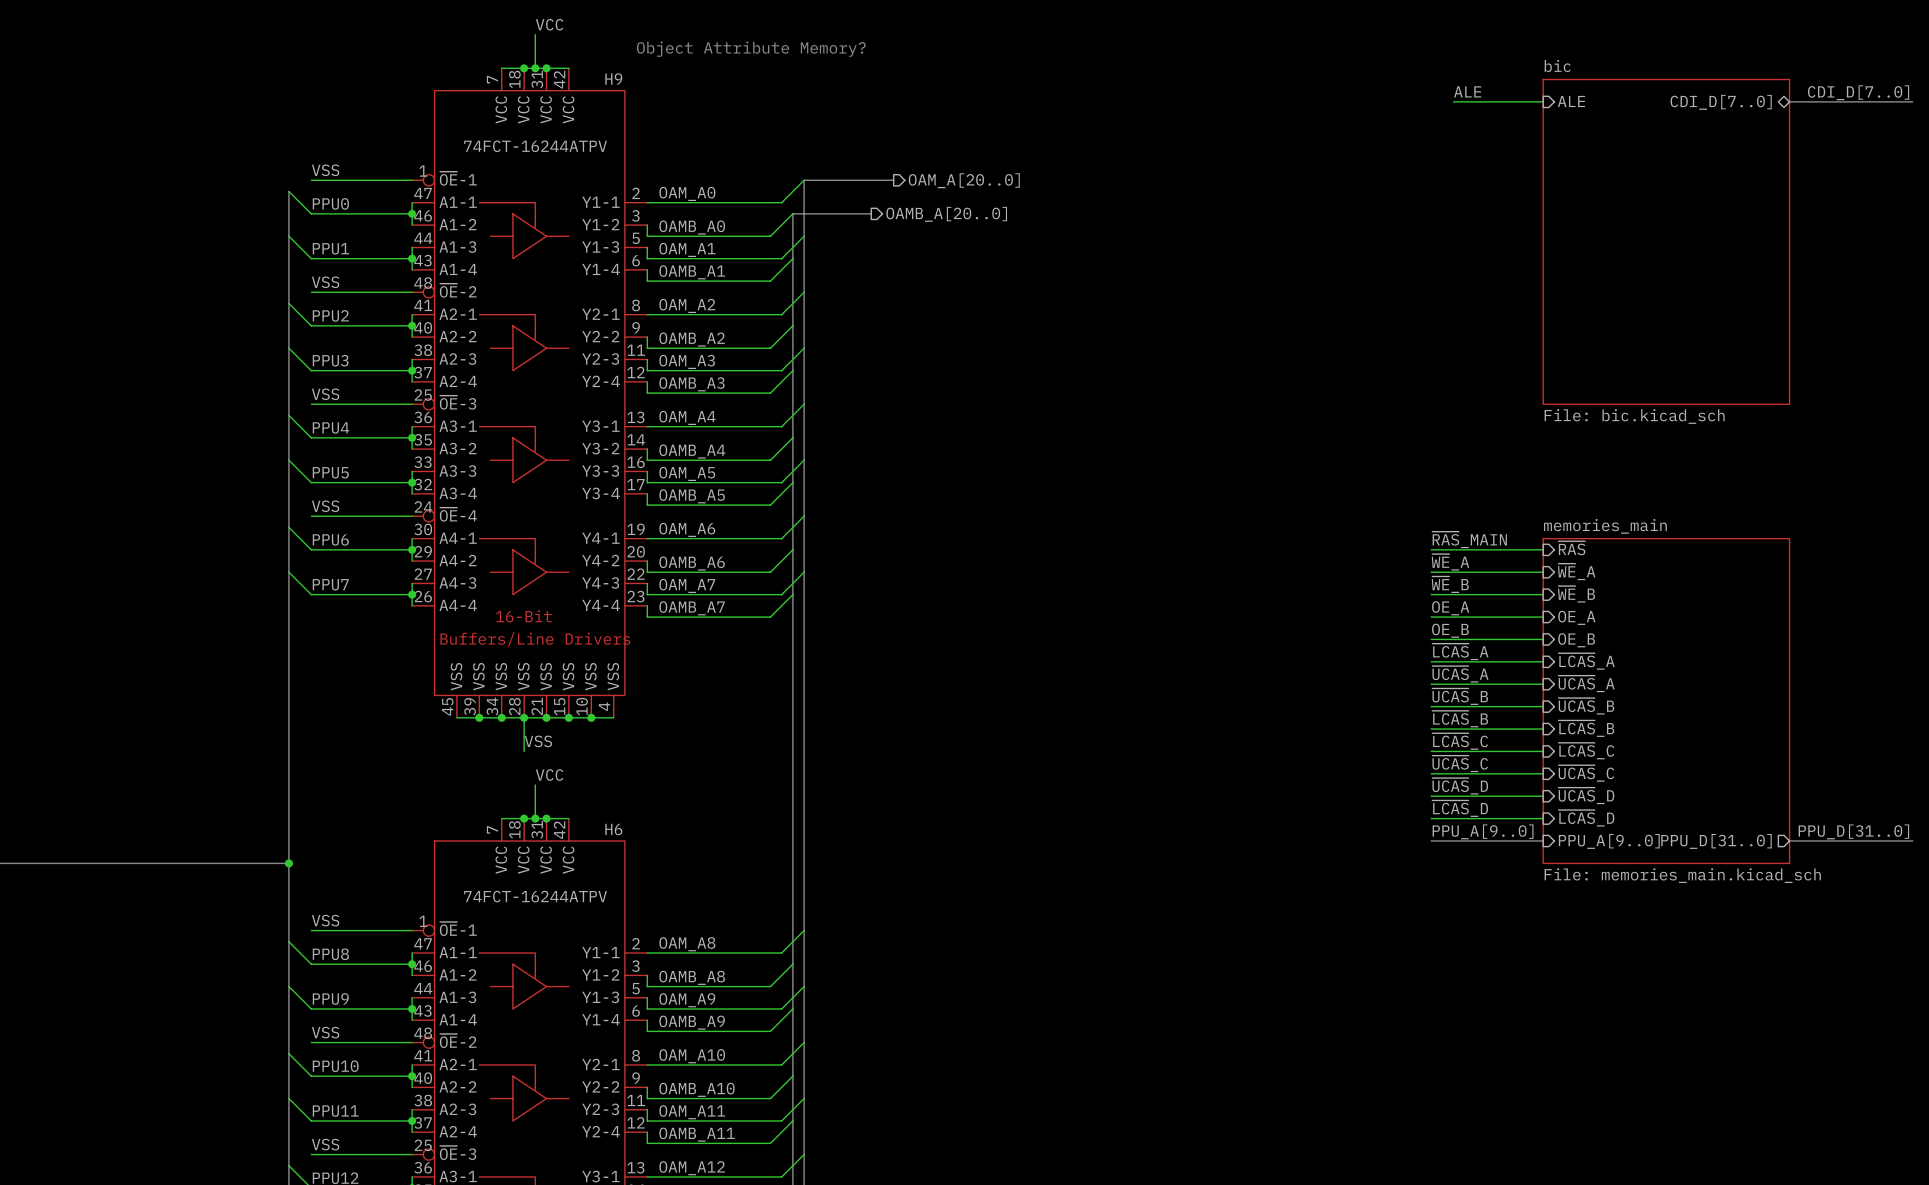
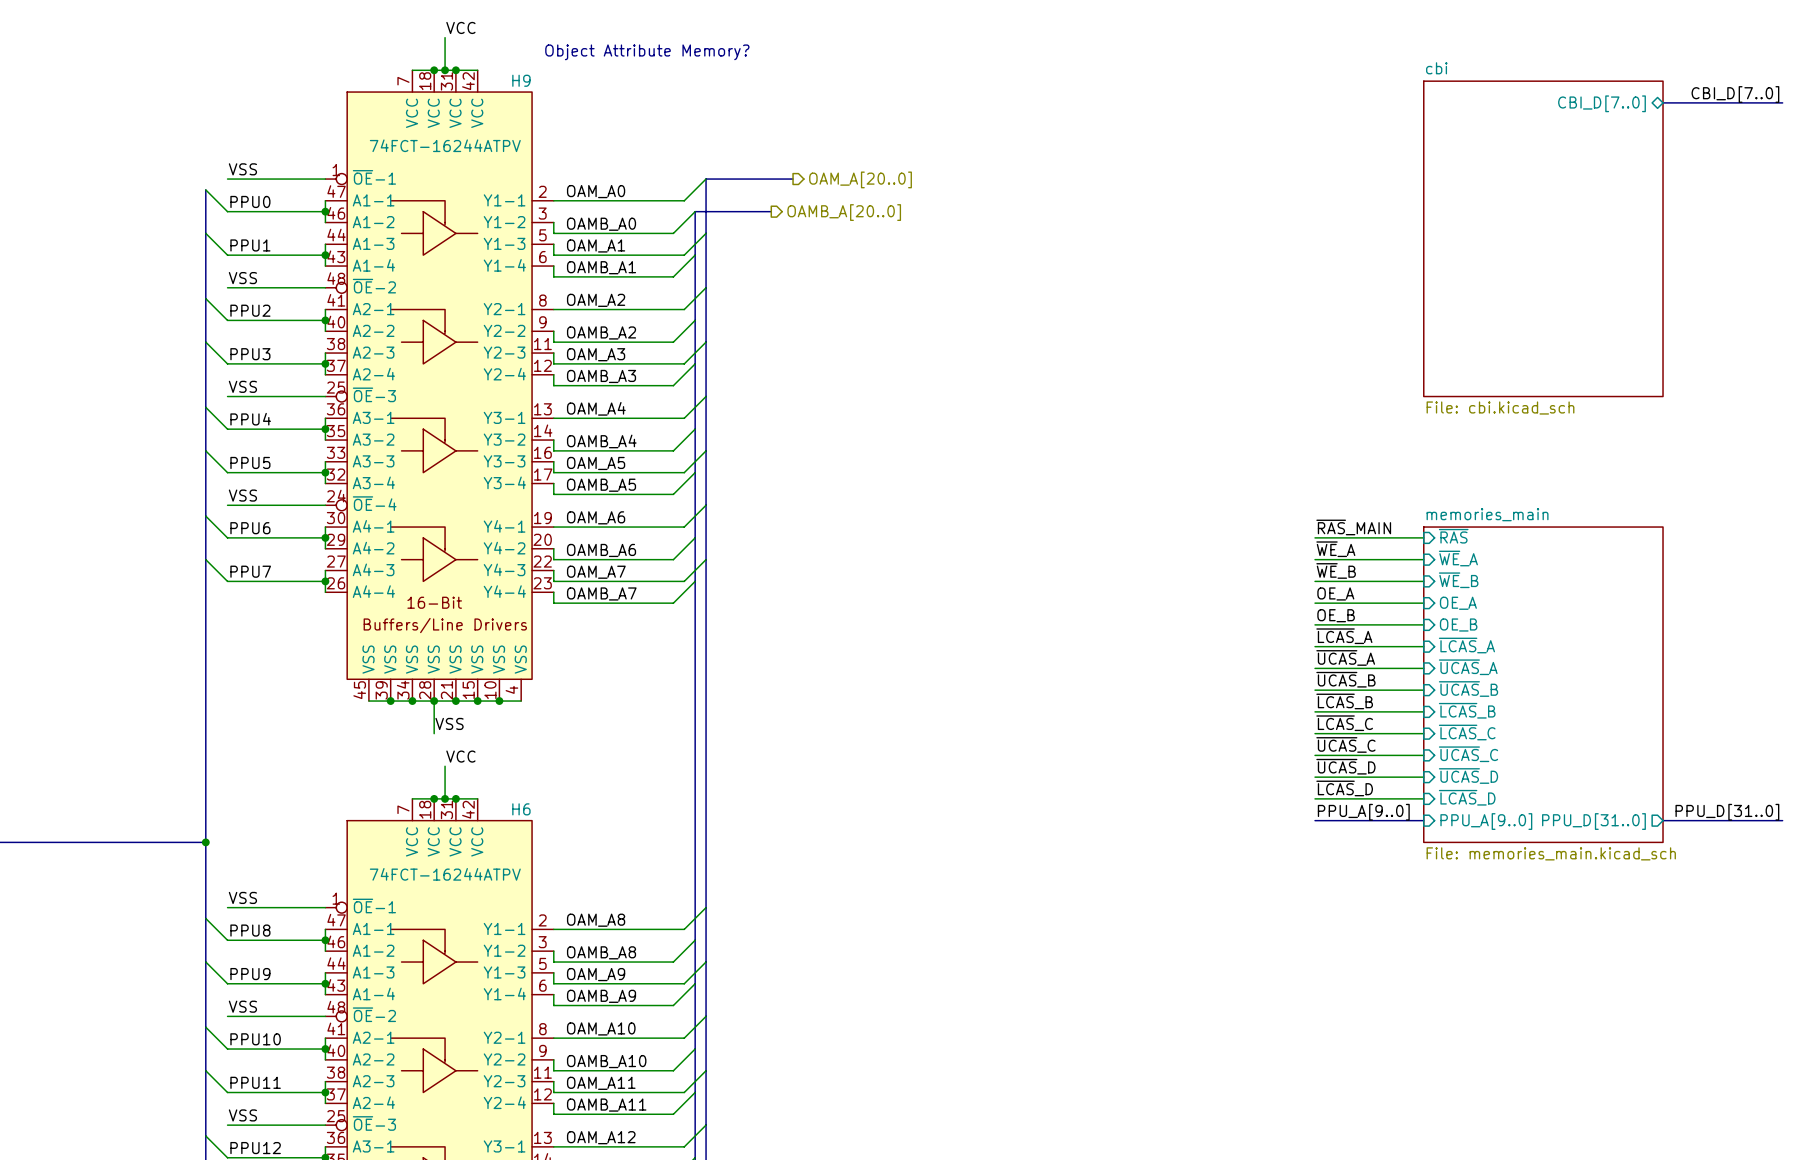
sheet bic name: bic (1557, 65) -> cbi (1436, 68)
label: ALE (1467, 91) -> none
label: CDI_D[7..0] (1858, 92) -> CBI_D[7..0] (1735, 94)
wire: (1453, 101) (1543, 101) -> none
sheet pin: ALE (1571, 101) -> none
sheet pin: CDI_D[7..0] (1721, 102) -> CBI_D[7..0] (1601, 103)
sheet bic value: File: bic.kicad_sch (1634, 416) -> File: cbi.kicad_sch (1500, 408)

